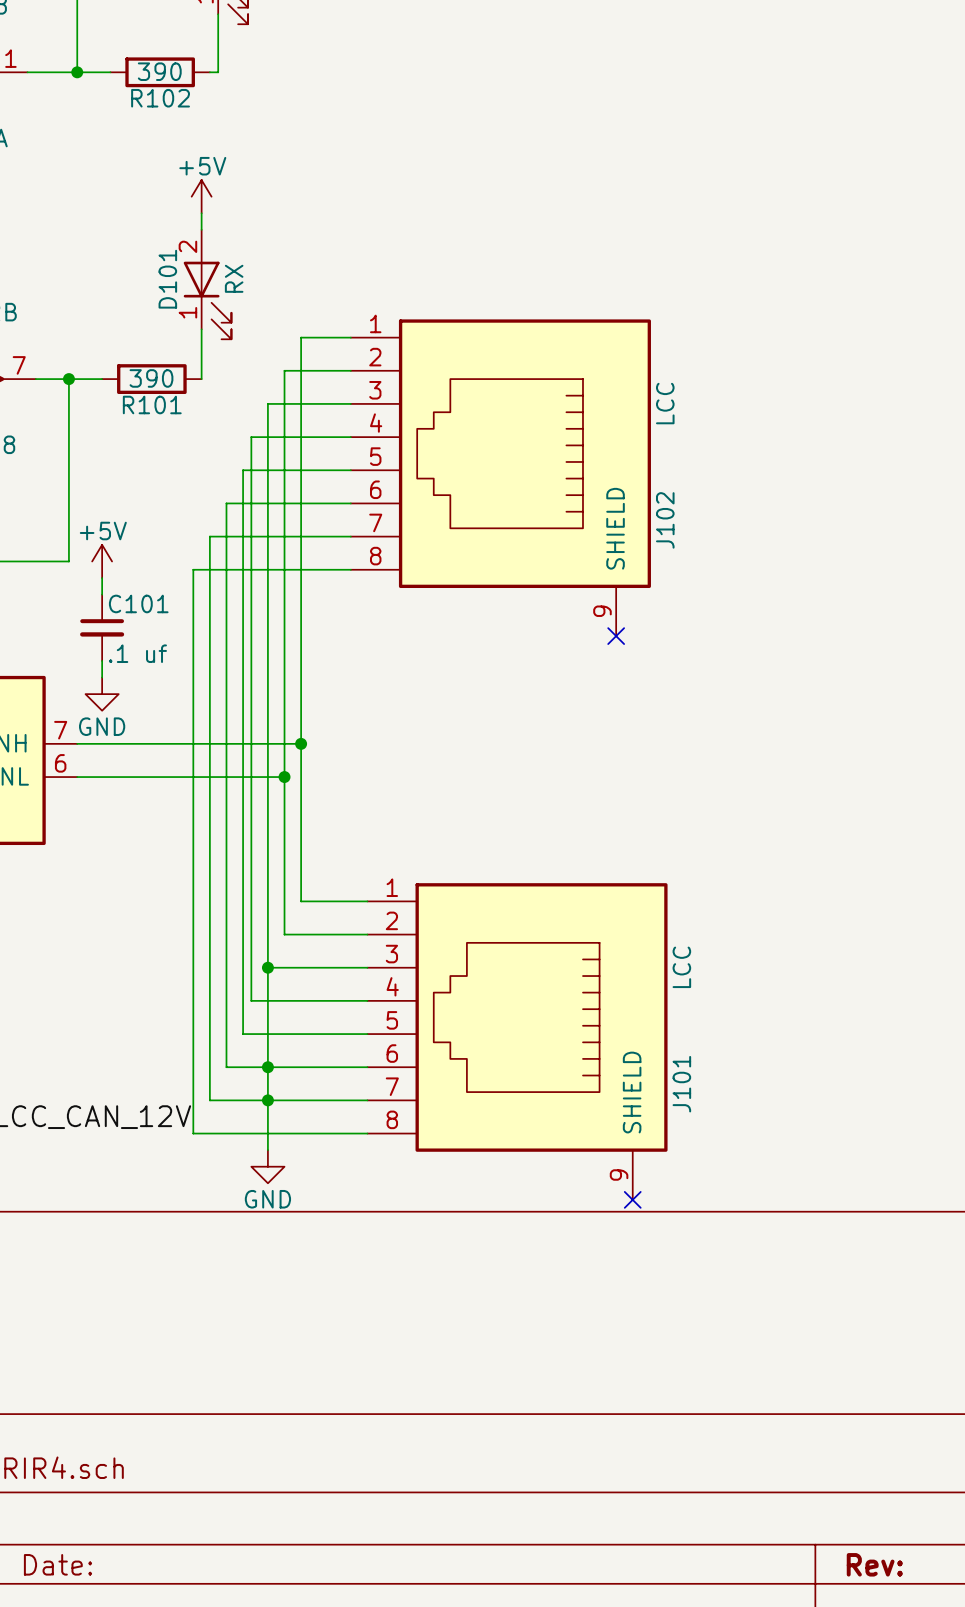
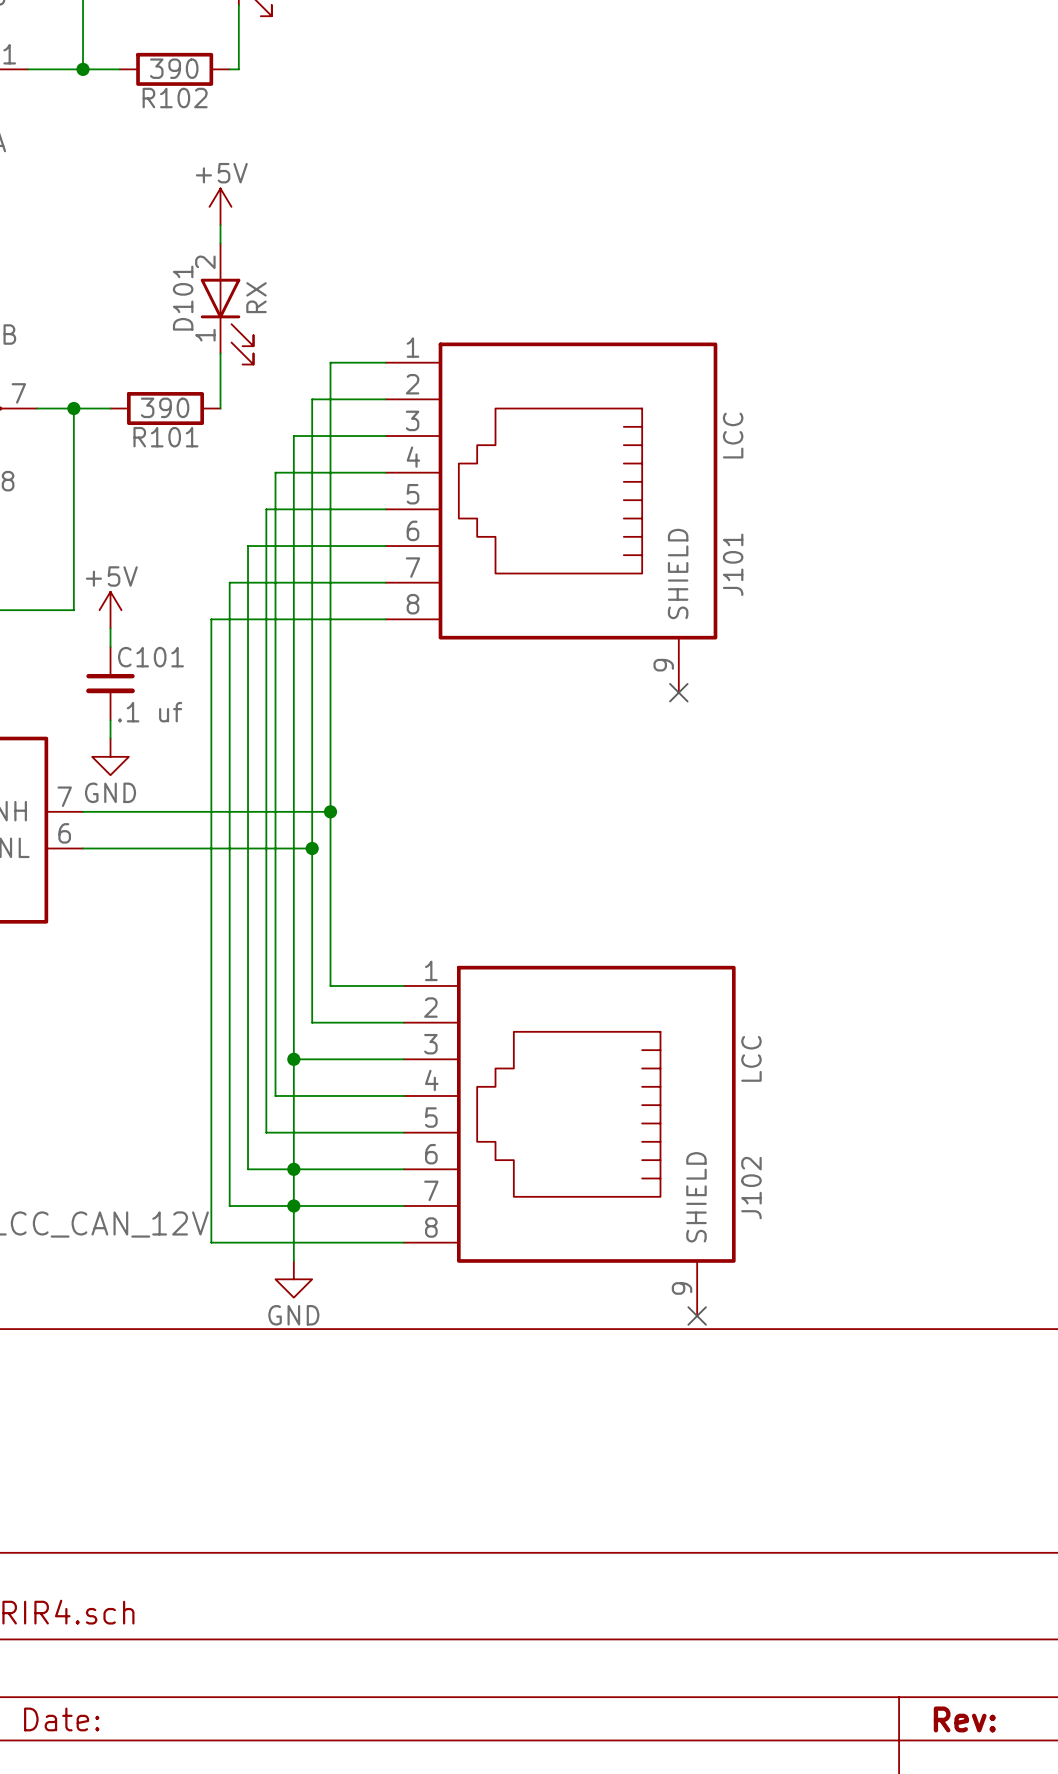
J102 name: J102 (665, 520) -> J101 (733, 564)
J101 name: J101 (681, 1084) -> J102 (751, 1188)

